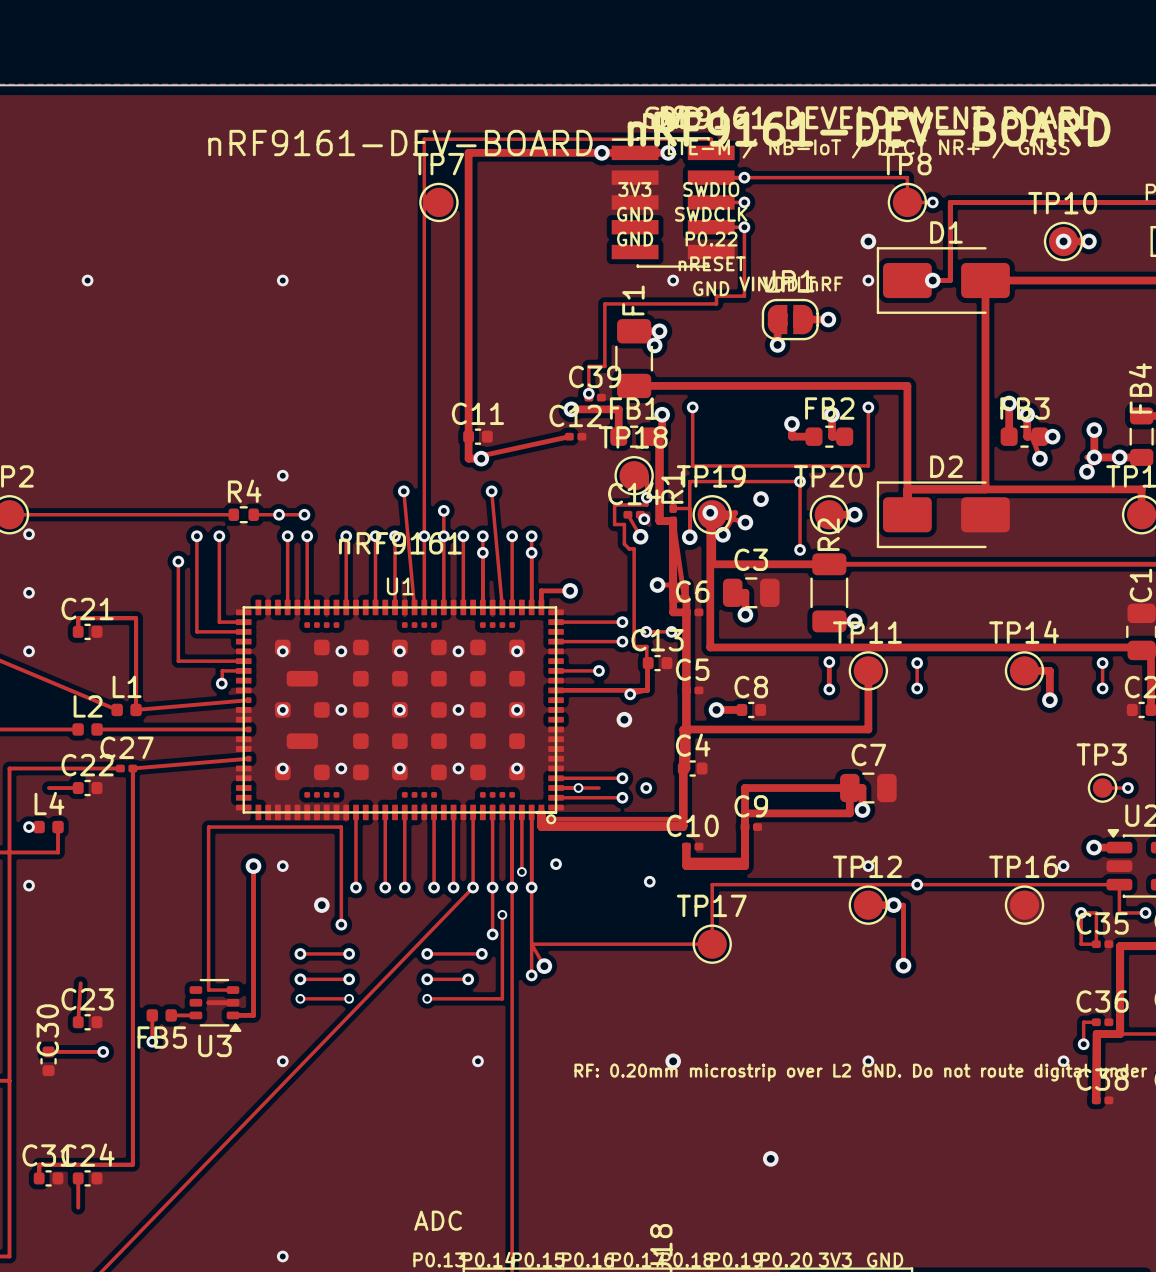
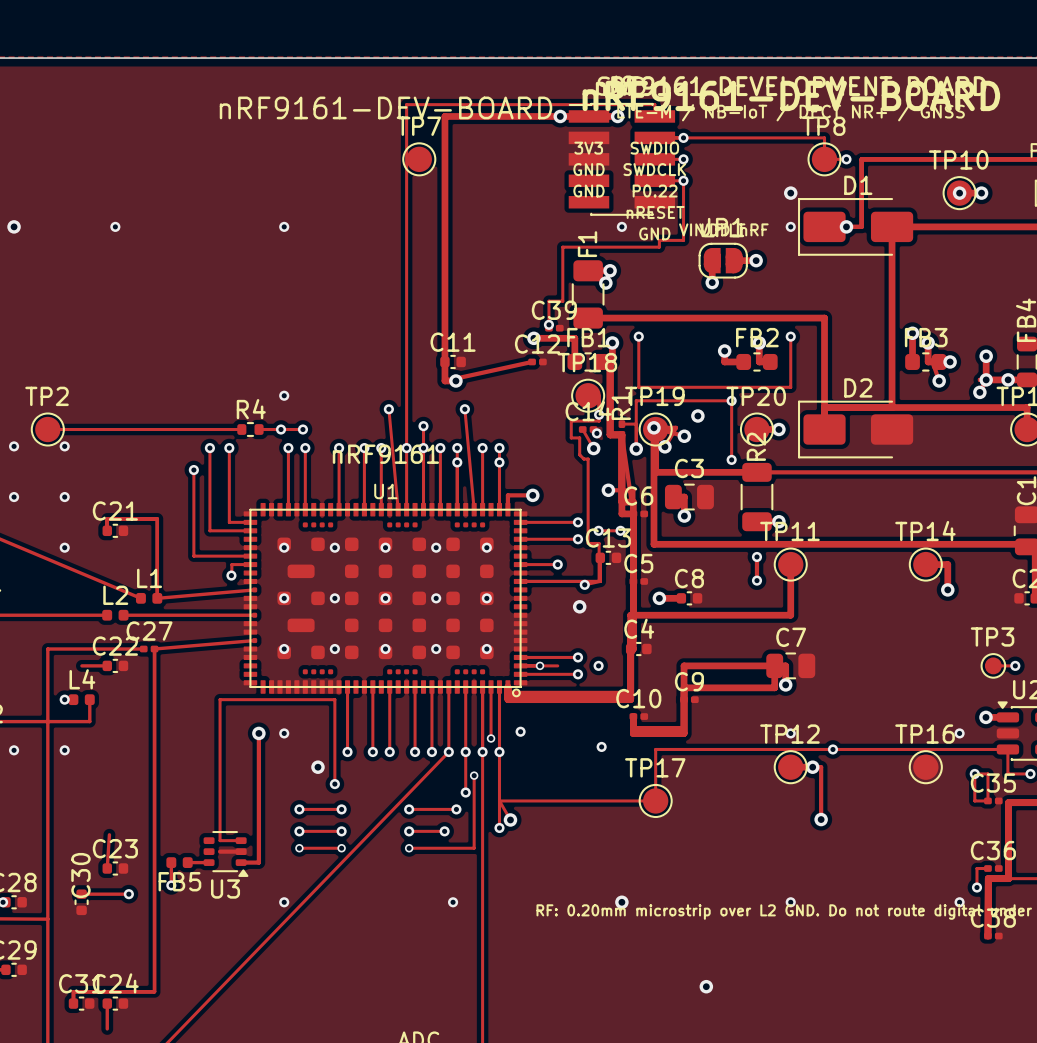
track: (917, 663) (917, 688) -> none
via: (917, 663) -> none
track: (1102, 663) (1102, 688) -> none
via: (1102, 663) -> none
via: (917, 688) -> none
via: (1102, 688) -> none

